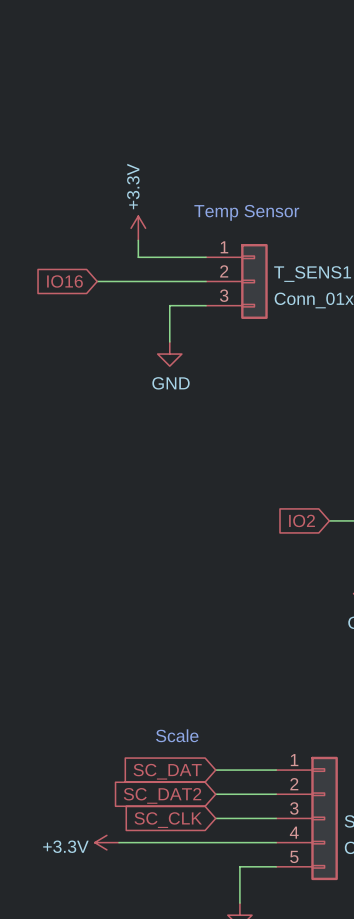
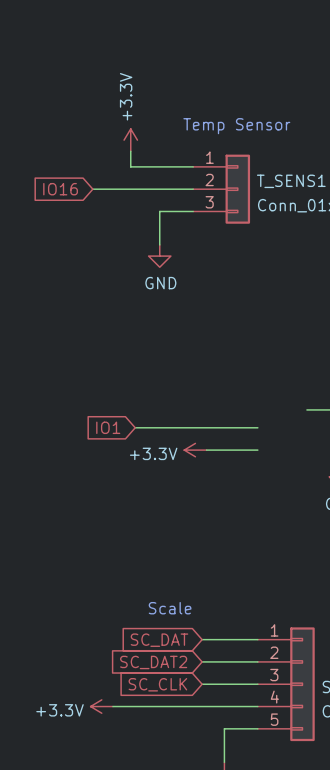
global label: IO2 (302, 520) -> none
global label: none -> IO1 (108, 427)
wire: none -> (135, 427) (257, 427)
power symbol: none -> +3.3V (195, 450)
wire: none -> (206, 450) (257, 450)

